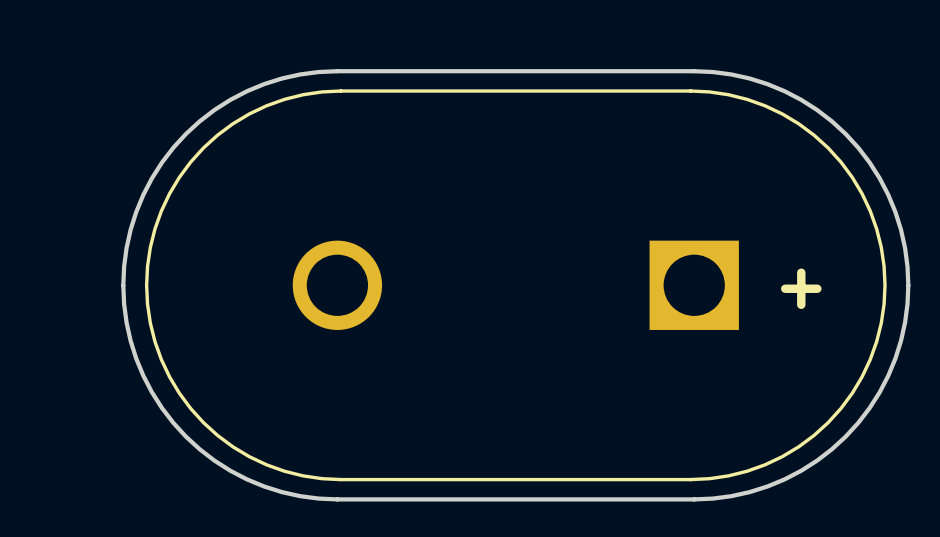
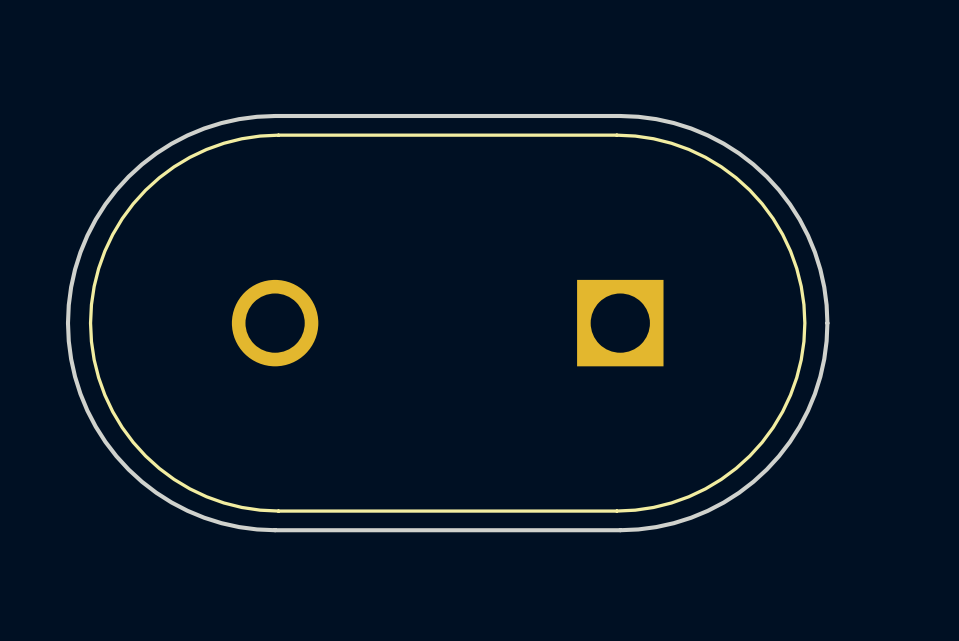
text: + (801, 288) -> none

